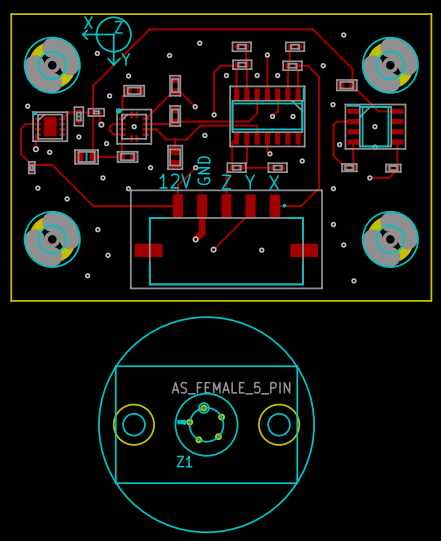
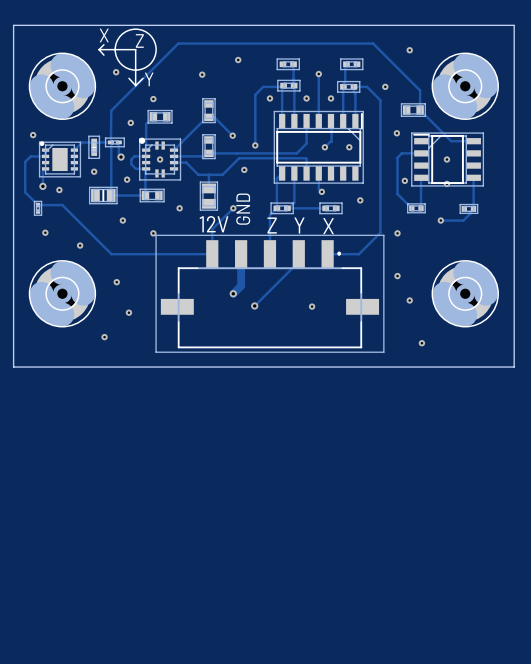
Z1: AS_FEMALE_5_PIN (206, 424) -> none

